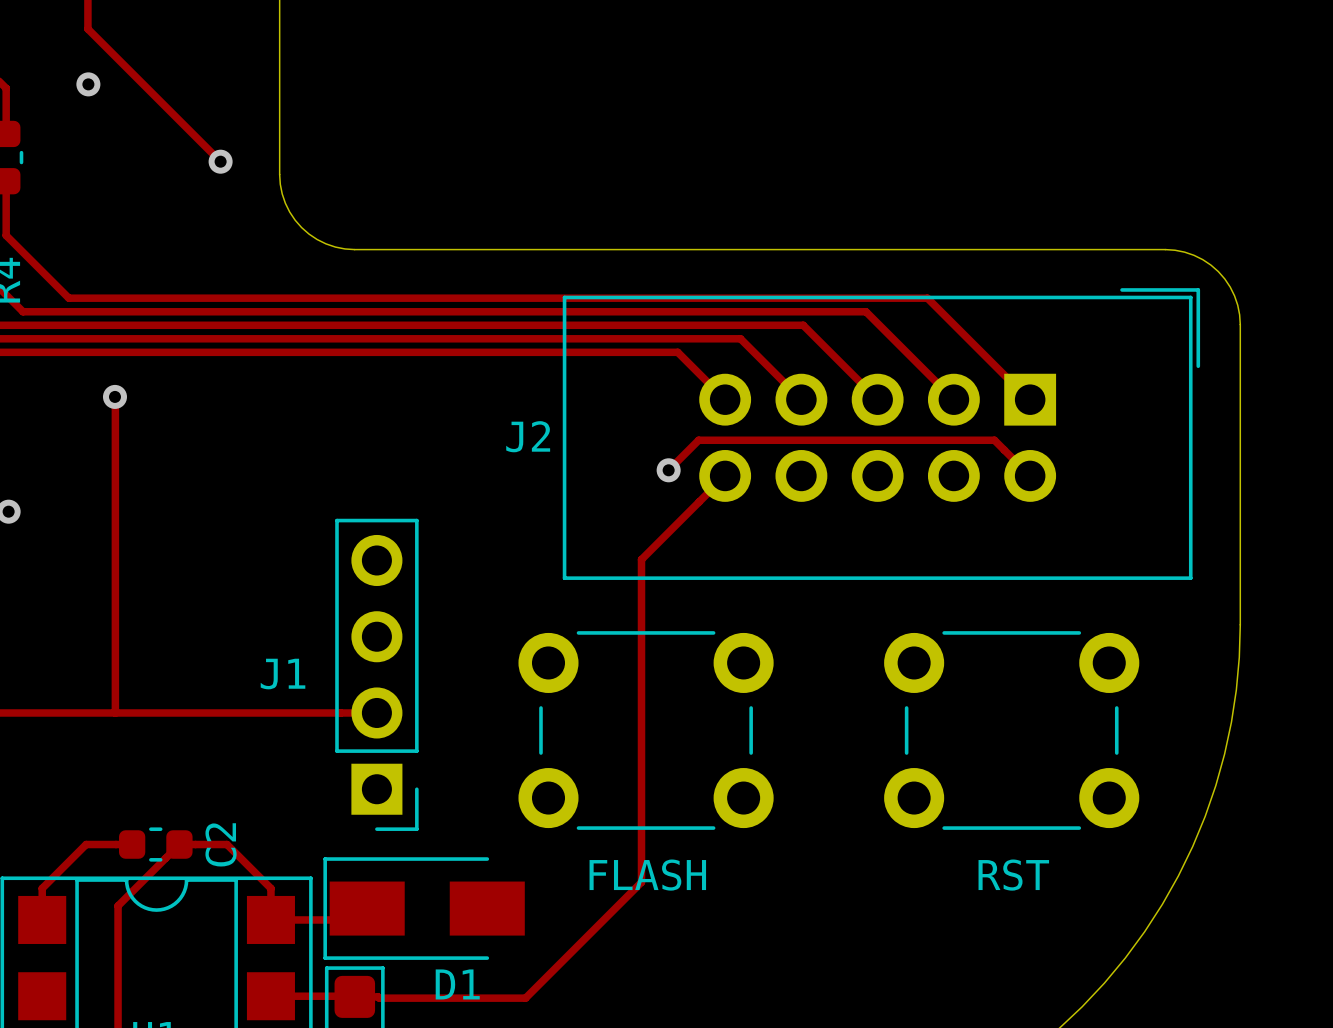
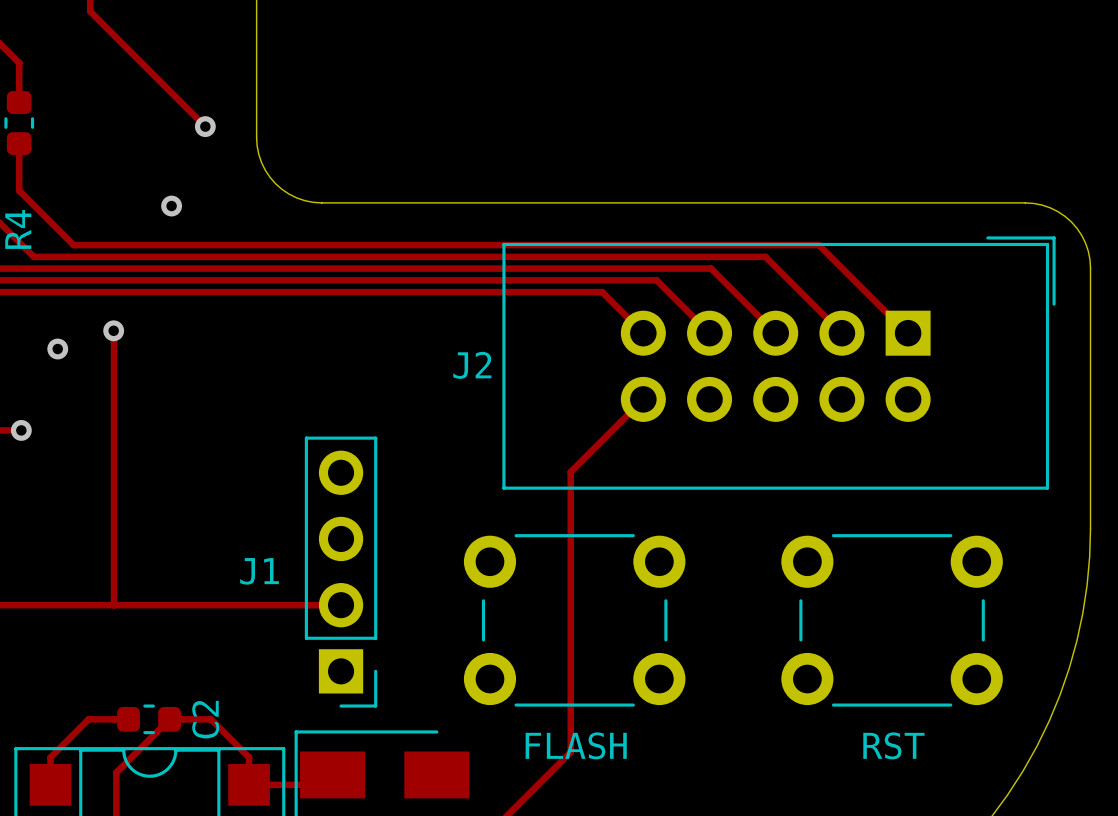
via: (88, 84) -> none
via: none -> (171, 206)
via: none -> (57, 349)
track: (668, 470) (698, 440) (994, 440) (1030, 475) -> none
via: (668, 470) -> none

